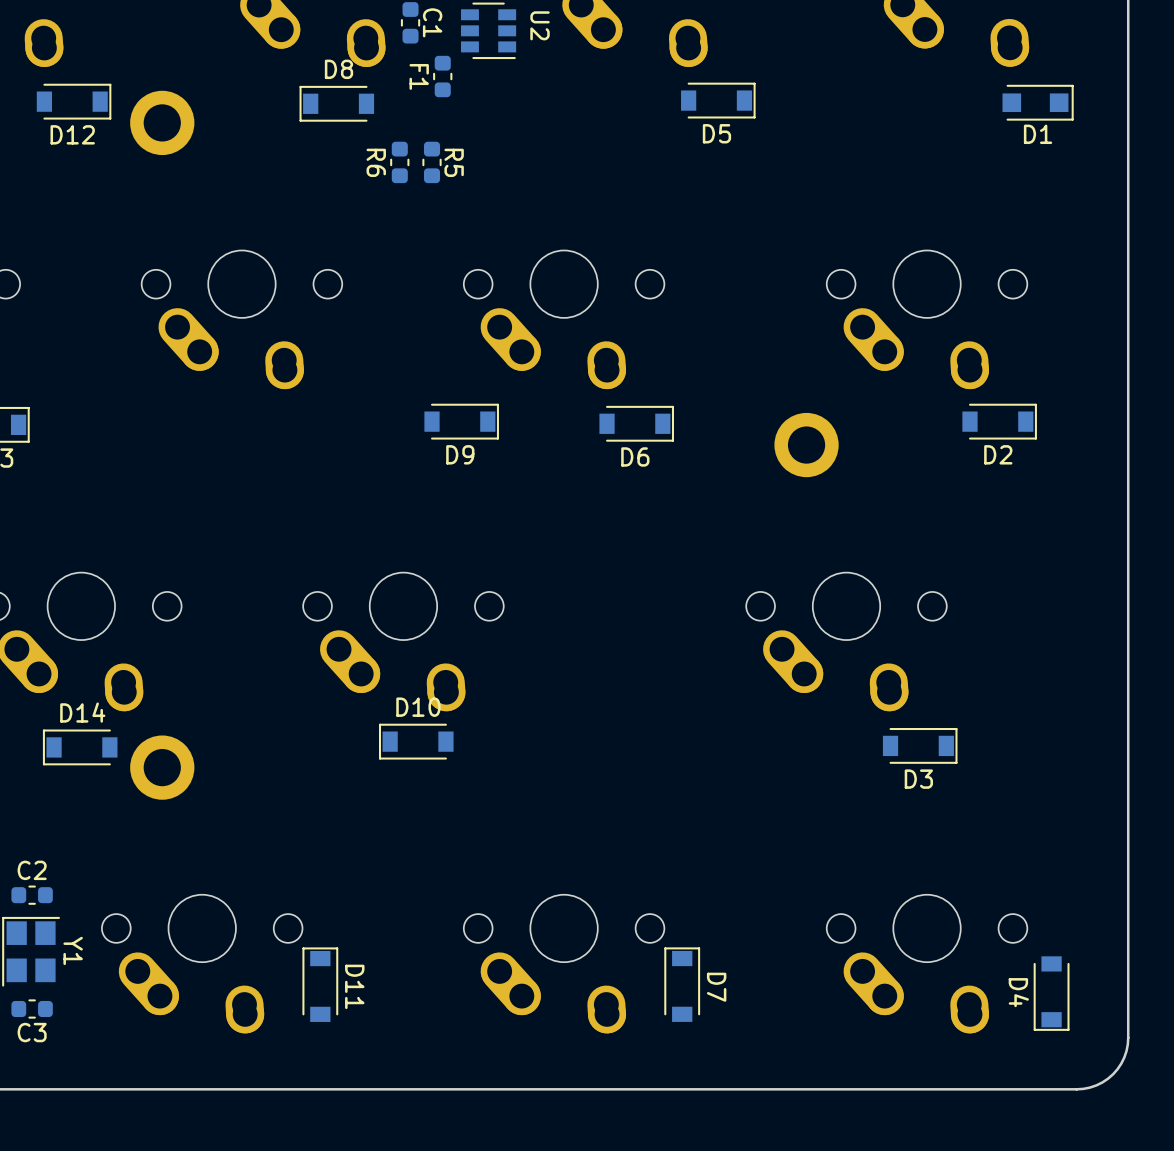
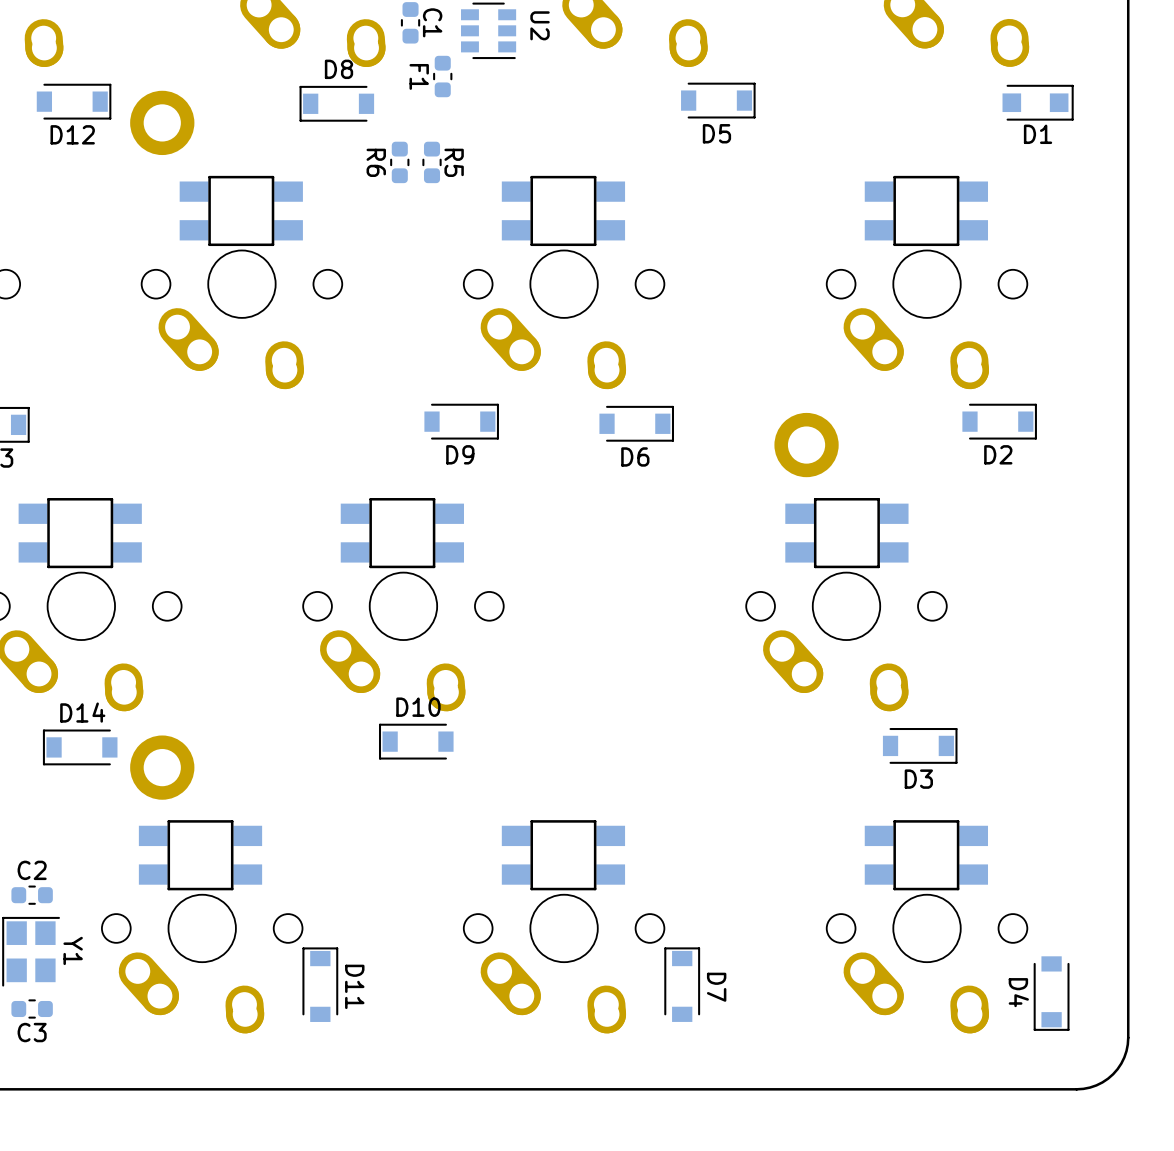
part: none -> (241, 210)
part: none -> (563, 210)
part: none -> (926, 210)
part: none -> (80, 533)
part: none -> (402, 533)
part: none -> (846, 533)
part: none -> (200, 855)
part: none -> (563, 855)
part: none -> (926, 855)

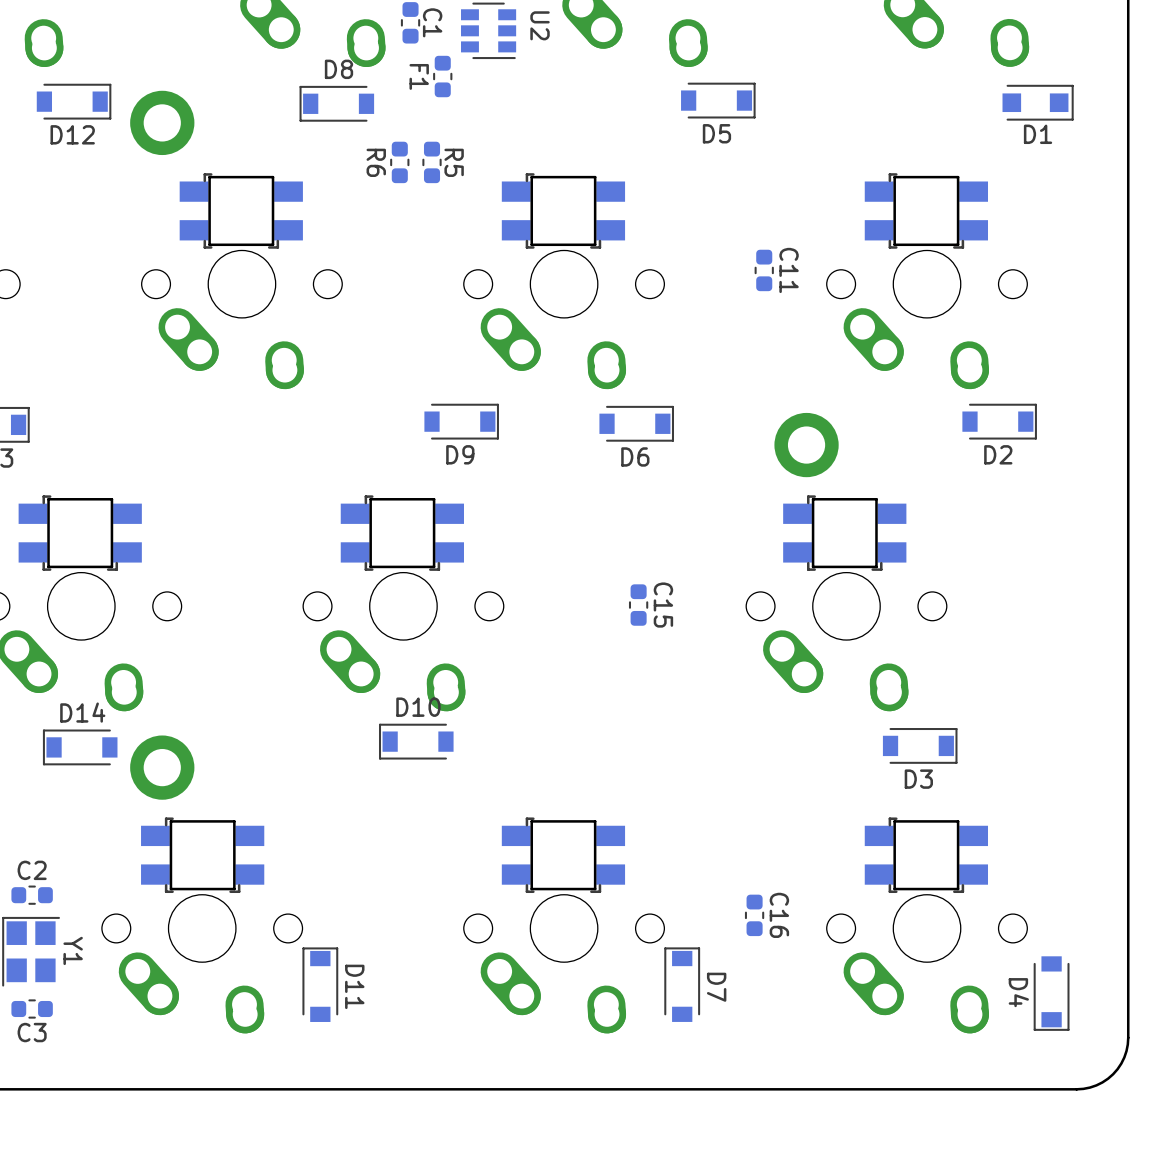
part footprint: [179, 175, 303, 247] -> [179, 173, 303, 249]
part footprint: [501, 175, 626, 247] -> [501, 173, 626, 249]
part footprint: [864, 175, 989, 247] -> [864, 173, 989, 249]
C11: none -> (764, 270)
part footprint: [18, 498, 142, 569] -> [18, 495, 142, 571]
part footprint: [340, 498, 464, 569] -> [340, 495, 464, 571]
part footprint: [785, 498, 909, 569] -> [783, 495, 907, 571]
C15: none -> (638, 605)
part footprint: [138, 820, 263, 891] -> [141, 817, 265, 894]
part footprint: [501, 820, 626, 891] -> [501, 817, 626, 894]
part footprint: [864, 820, 989, 891] -> [864, 817, 989, 894]
C16: none -> (754, 915)

